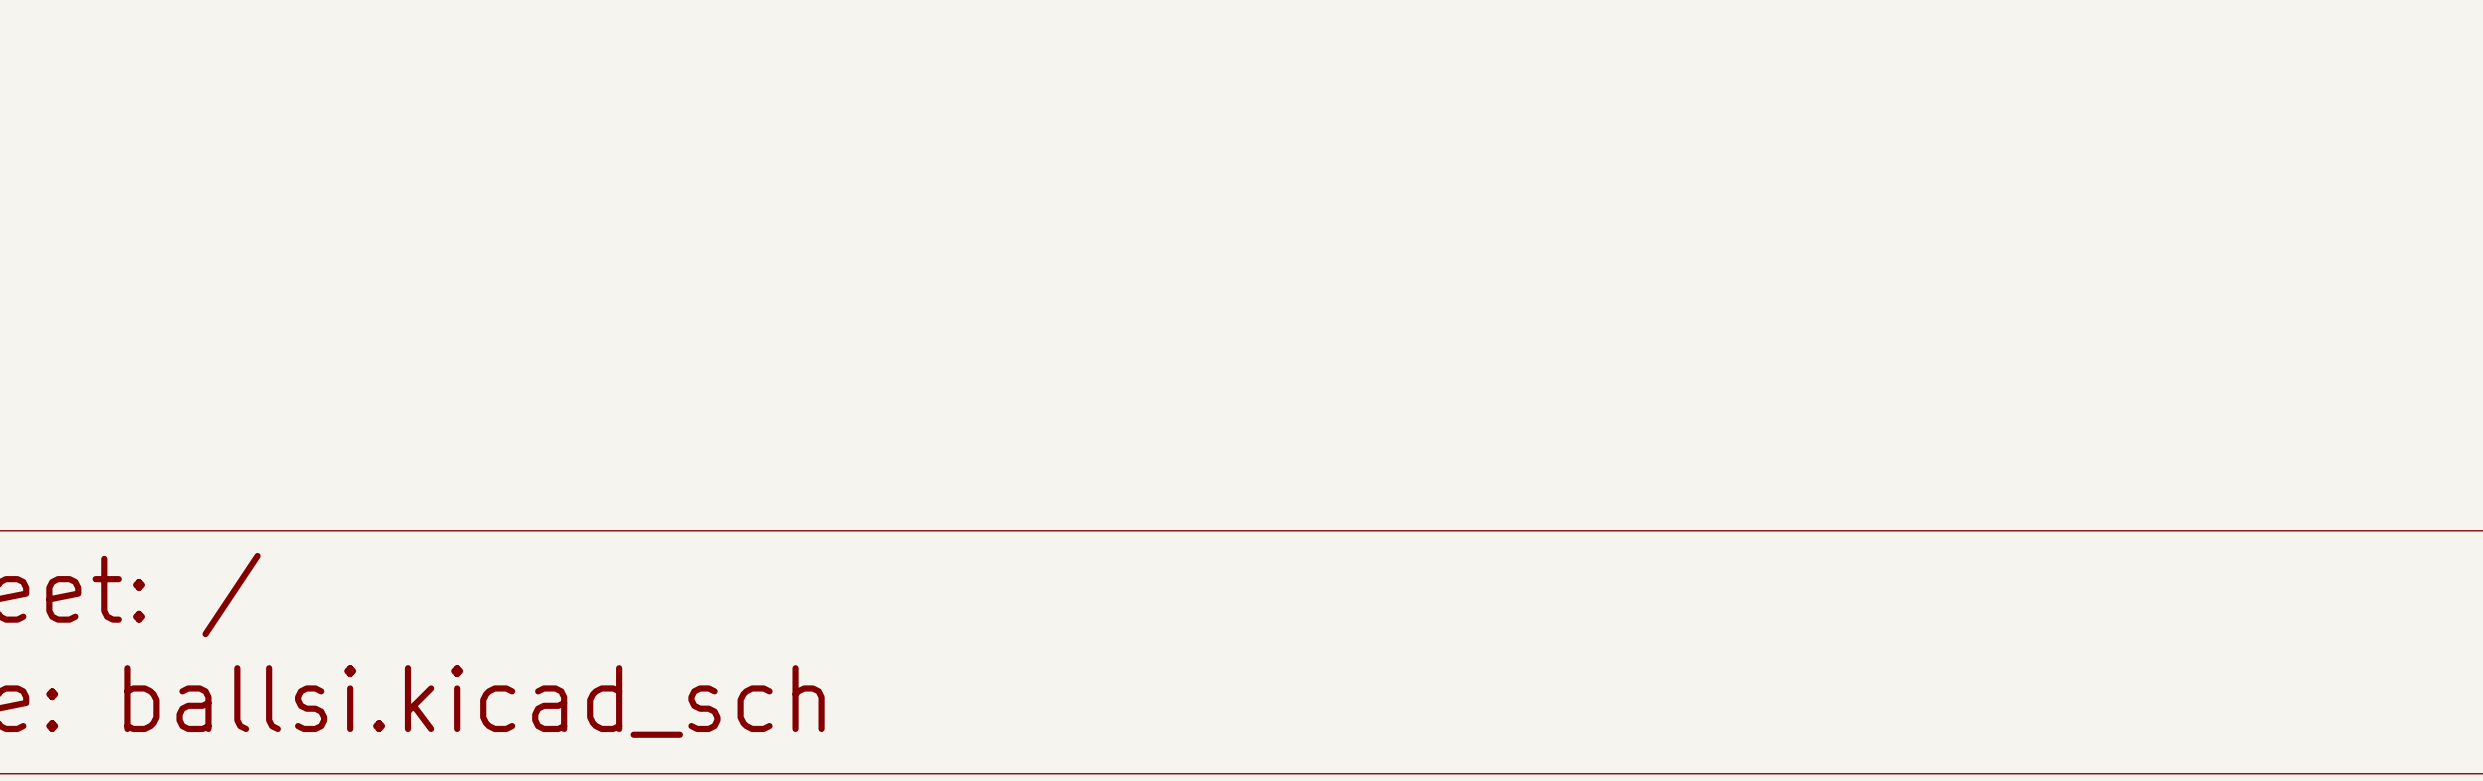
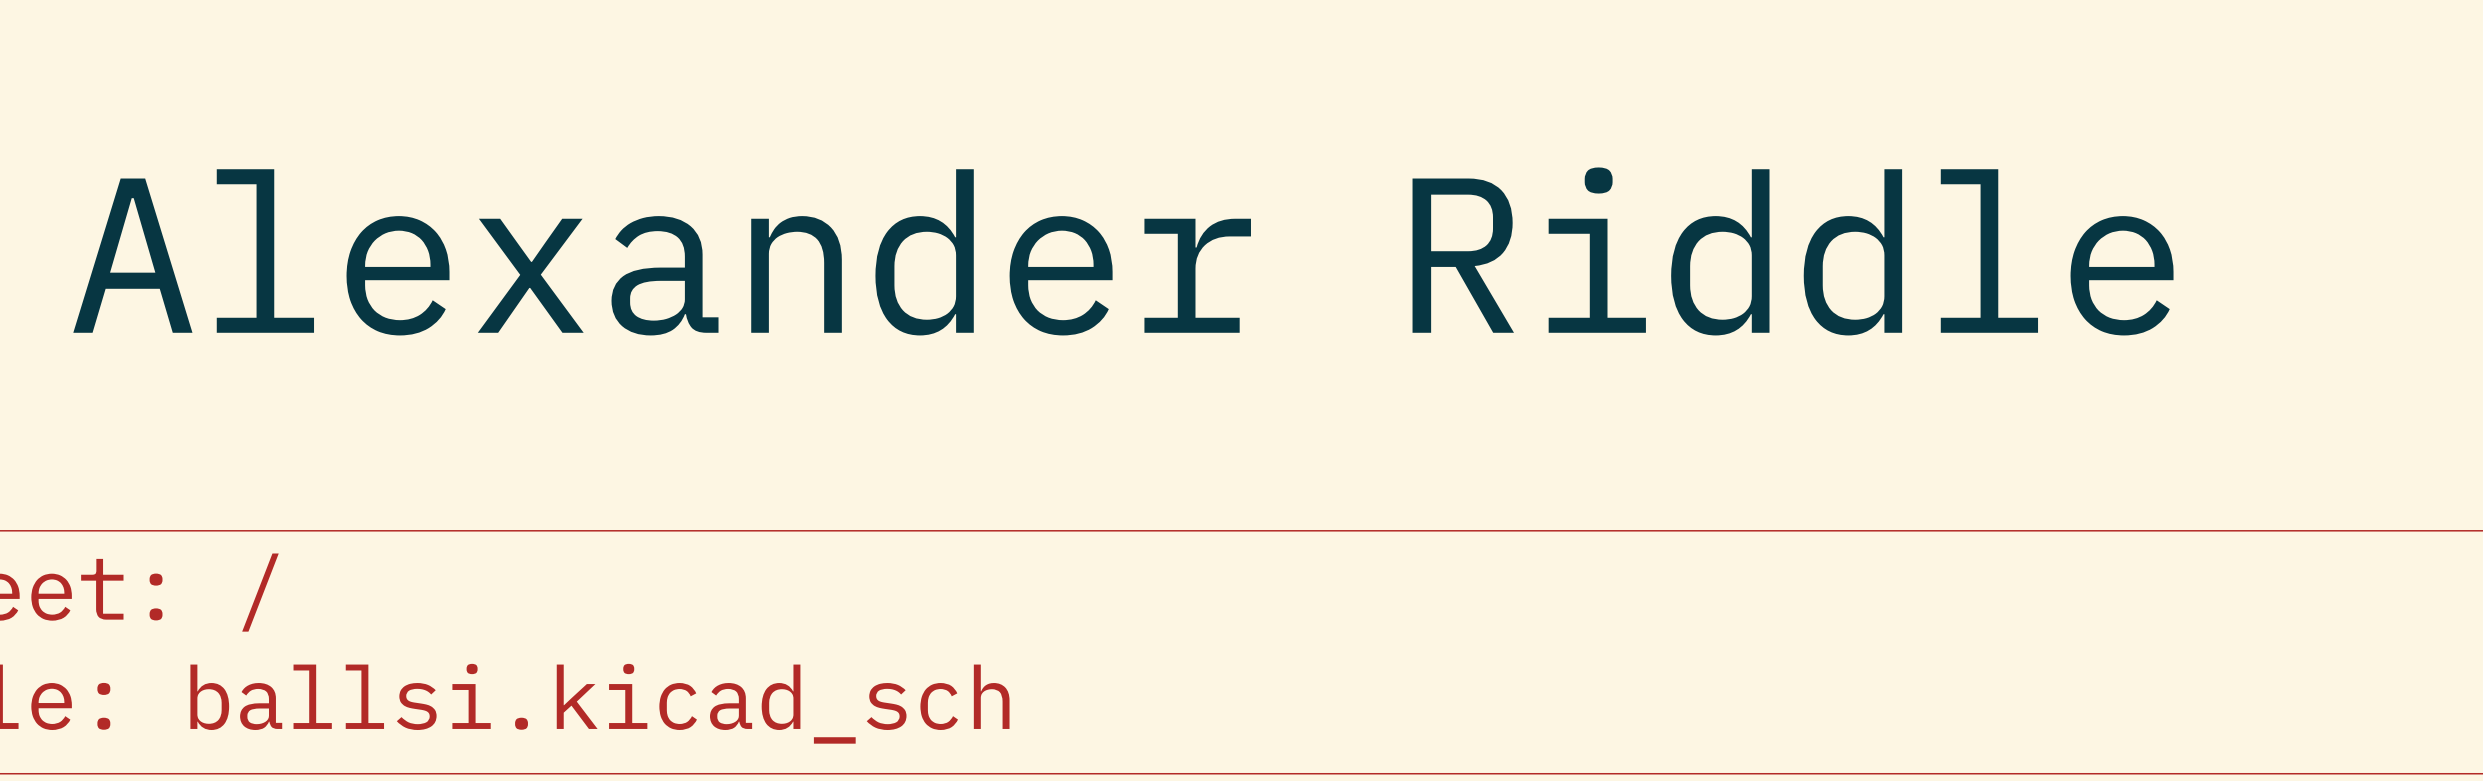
label: none -> Alexander Riddle (1123, 251)

